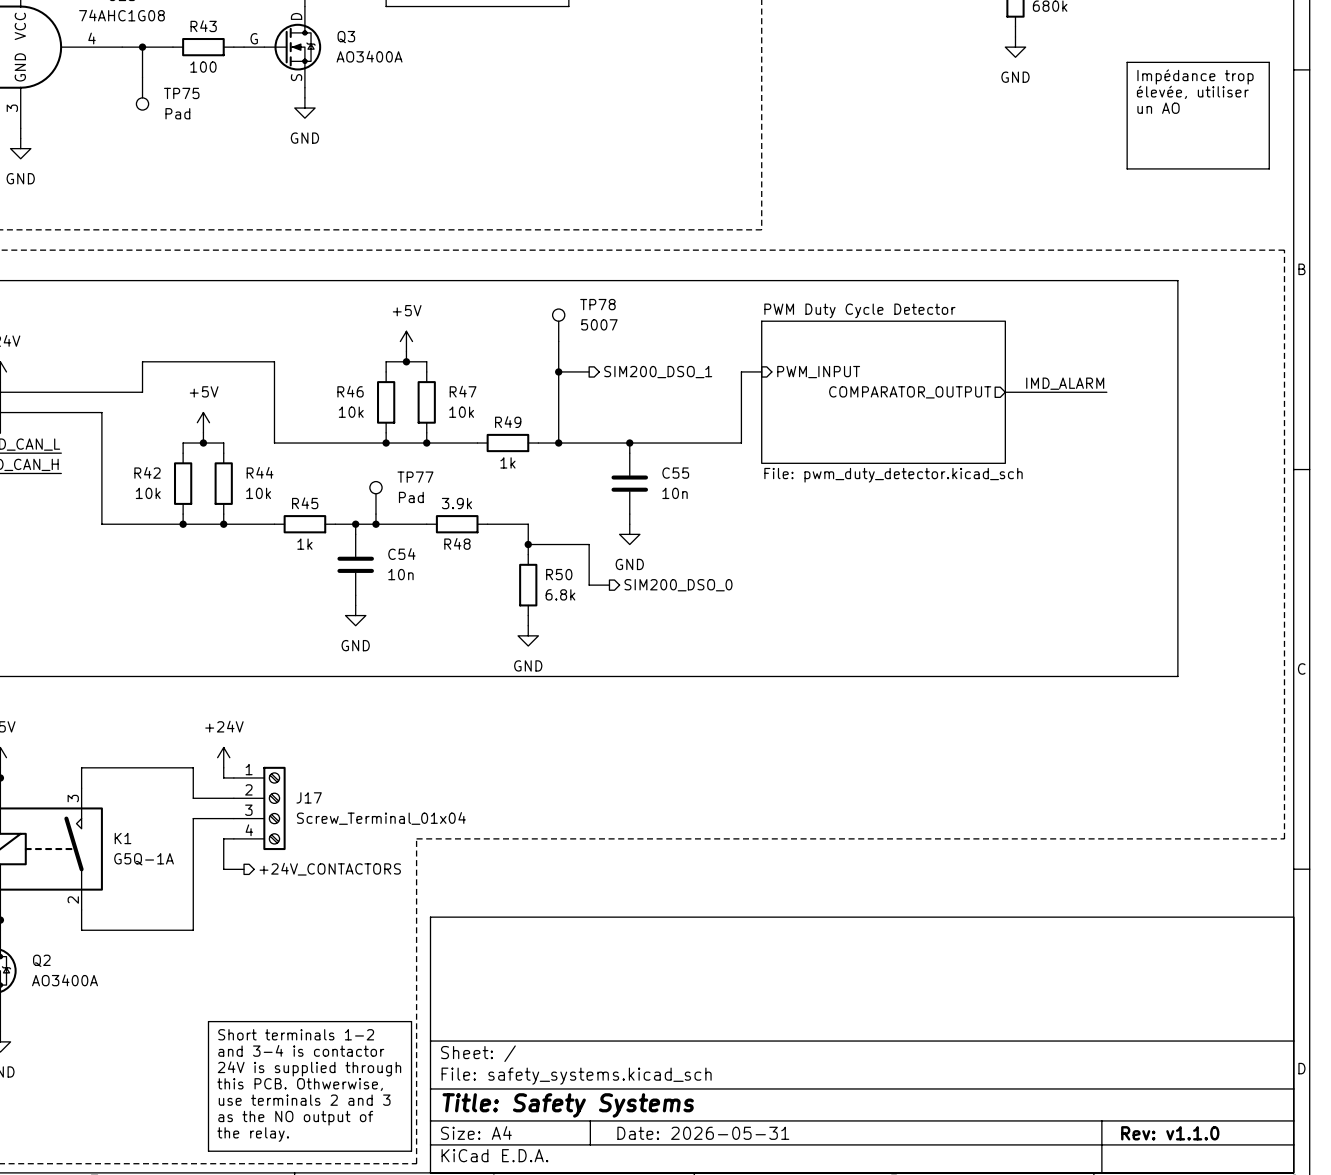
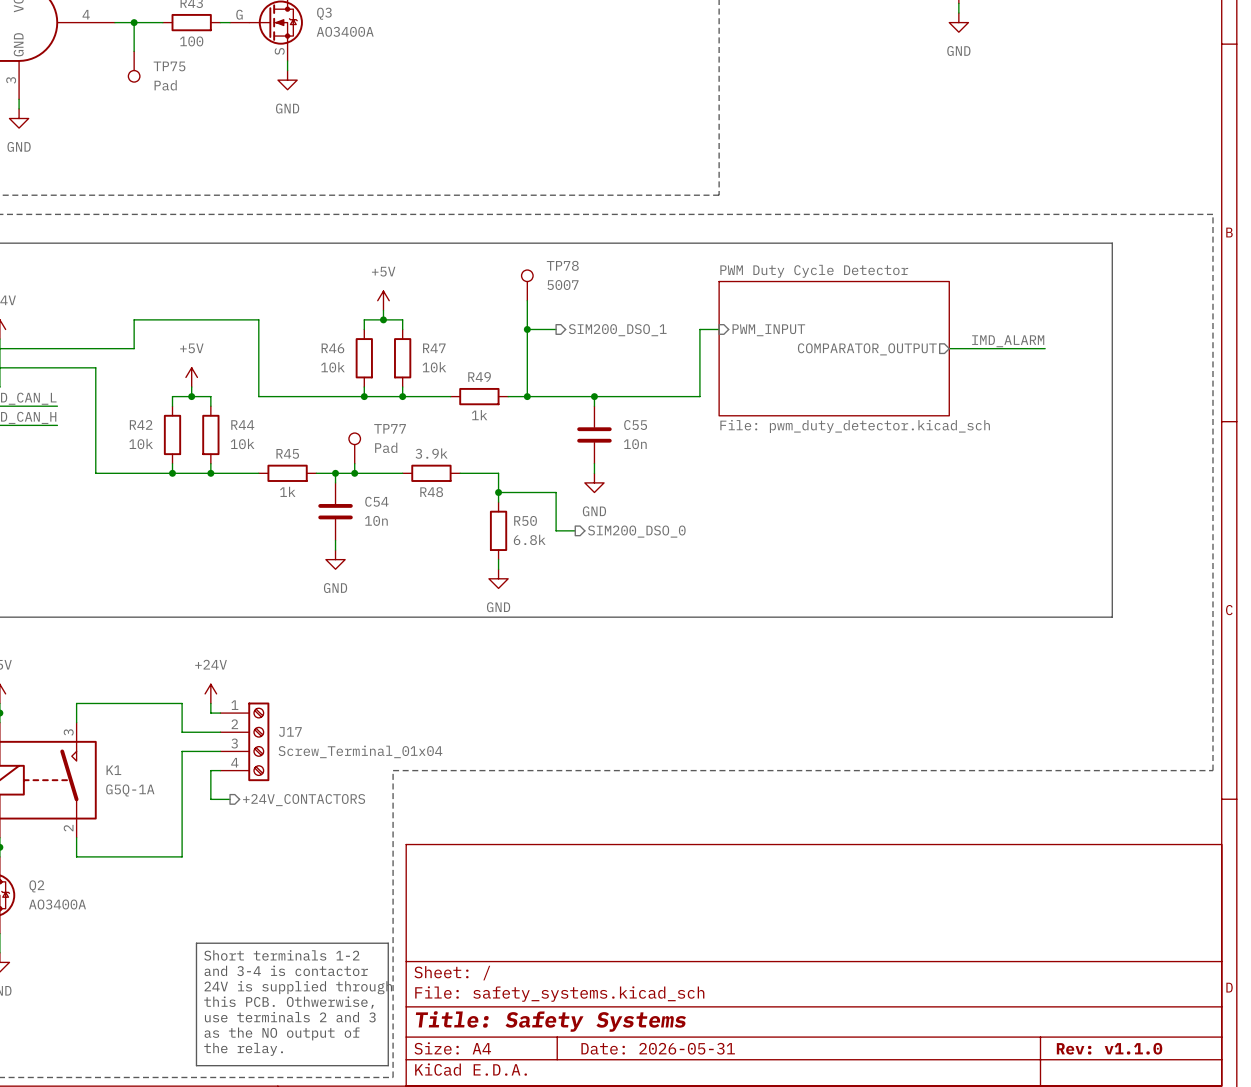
line: (1127, 62) (1269, 62) (1269, 168) (1127, 168) (1127, 62) -> none
text: Impédance trop (1195, 76) -> none
text: élevée, utiliser (1192, 92) -> none
text: un AO (1158, 108) -> none

